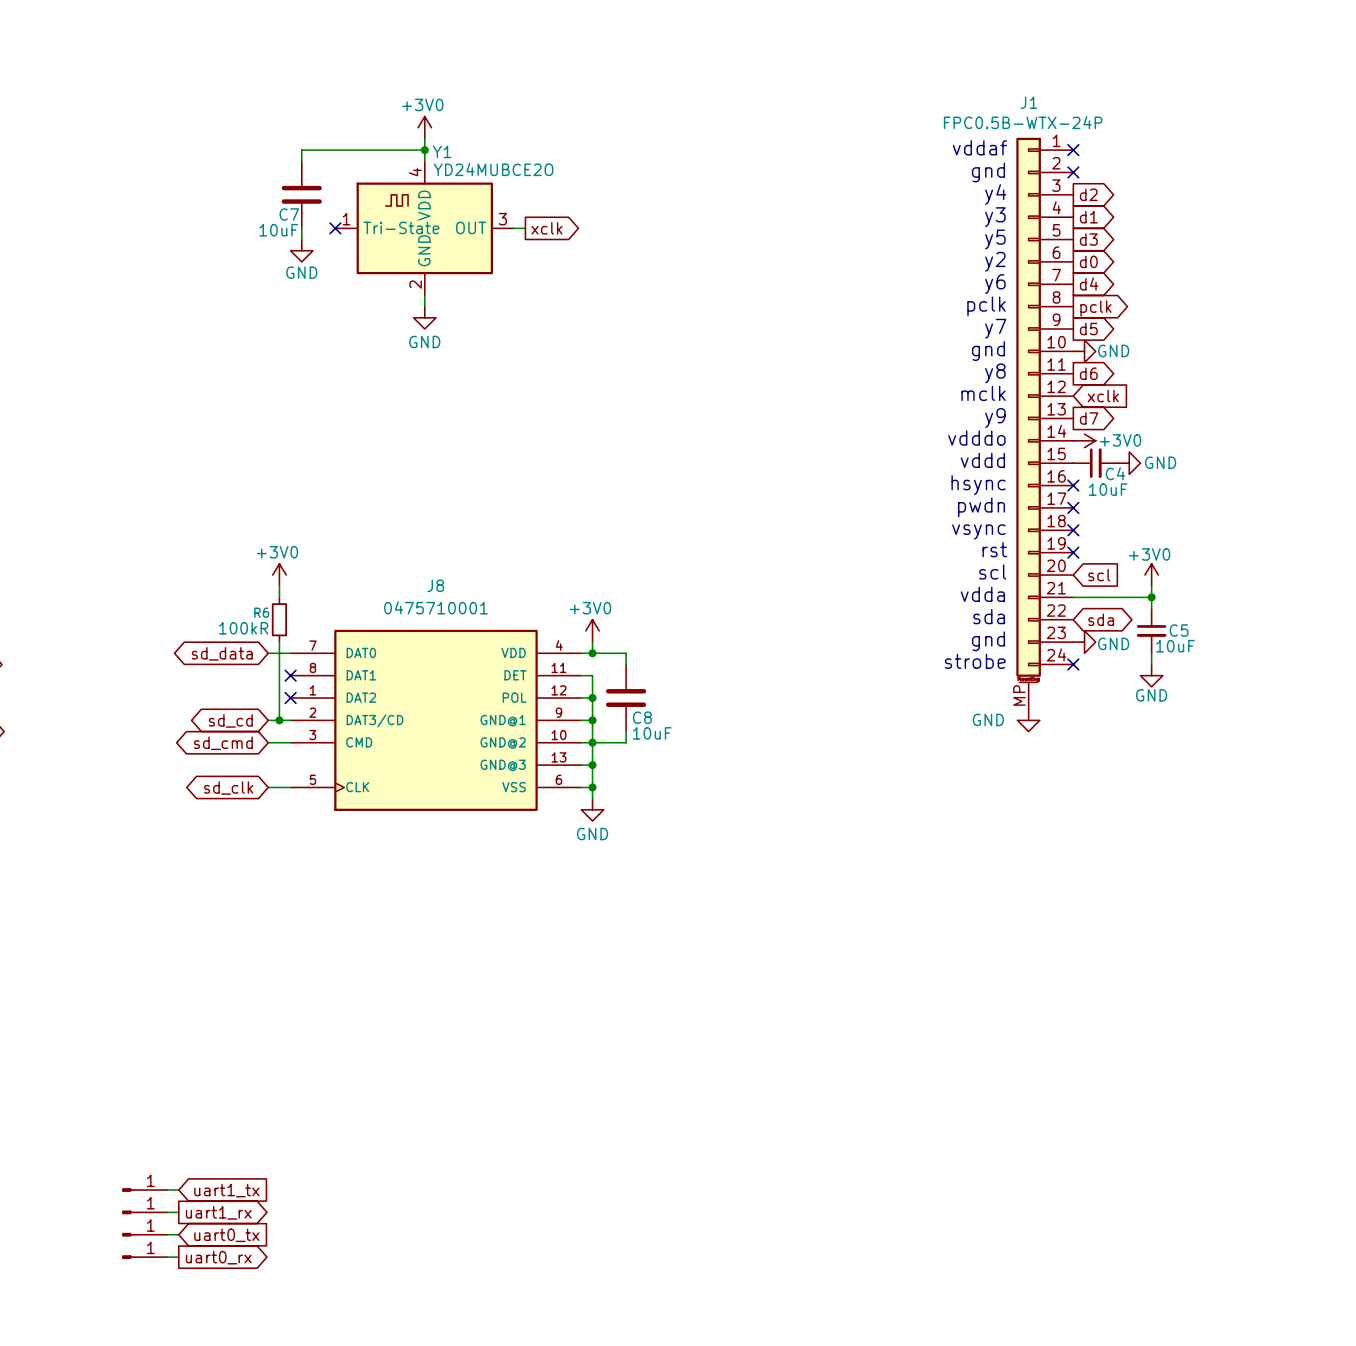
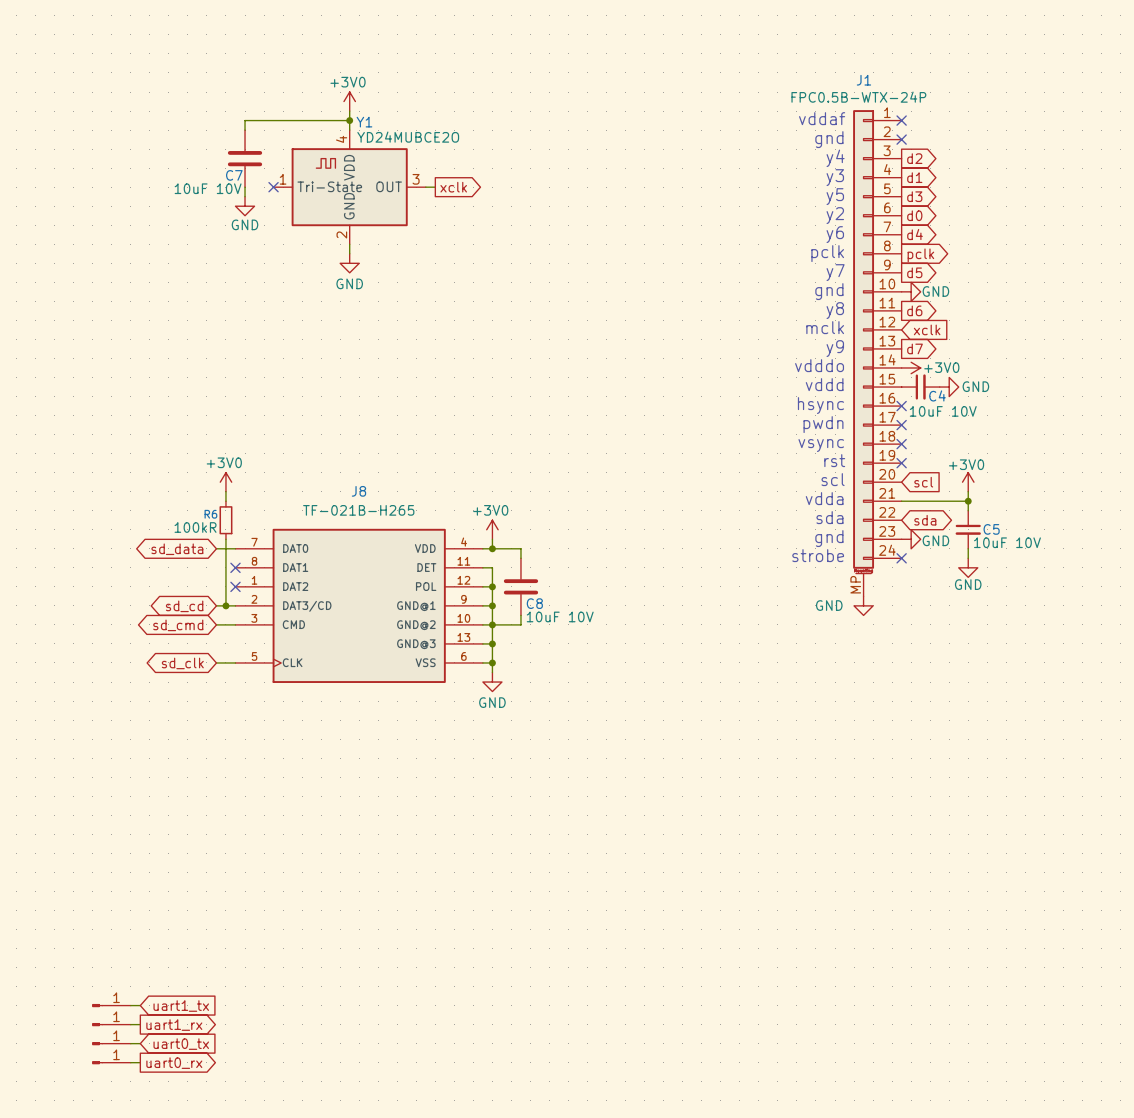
C7 value: 10uF (278, 230) -> 10uF 10V (208, 188)
C4 value: 10uF (1108, 489) -> 10uF 10V (943, 411)
J8 value: 0475710001 (435, 607) -> TF-021B-H265 (358, 510)
C5 value: 10uF (1175, 646) -> 10uF 10V (1007, 542)
C8 value: 10uF (652, 733) -> 10uF 10V (560, 616)

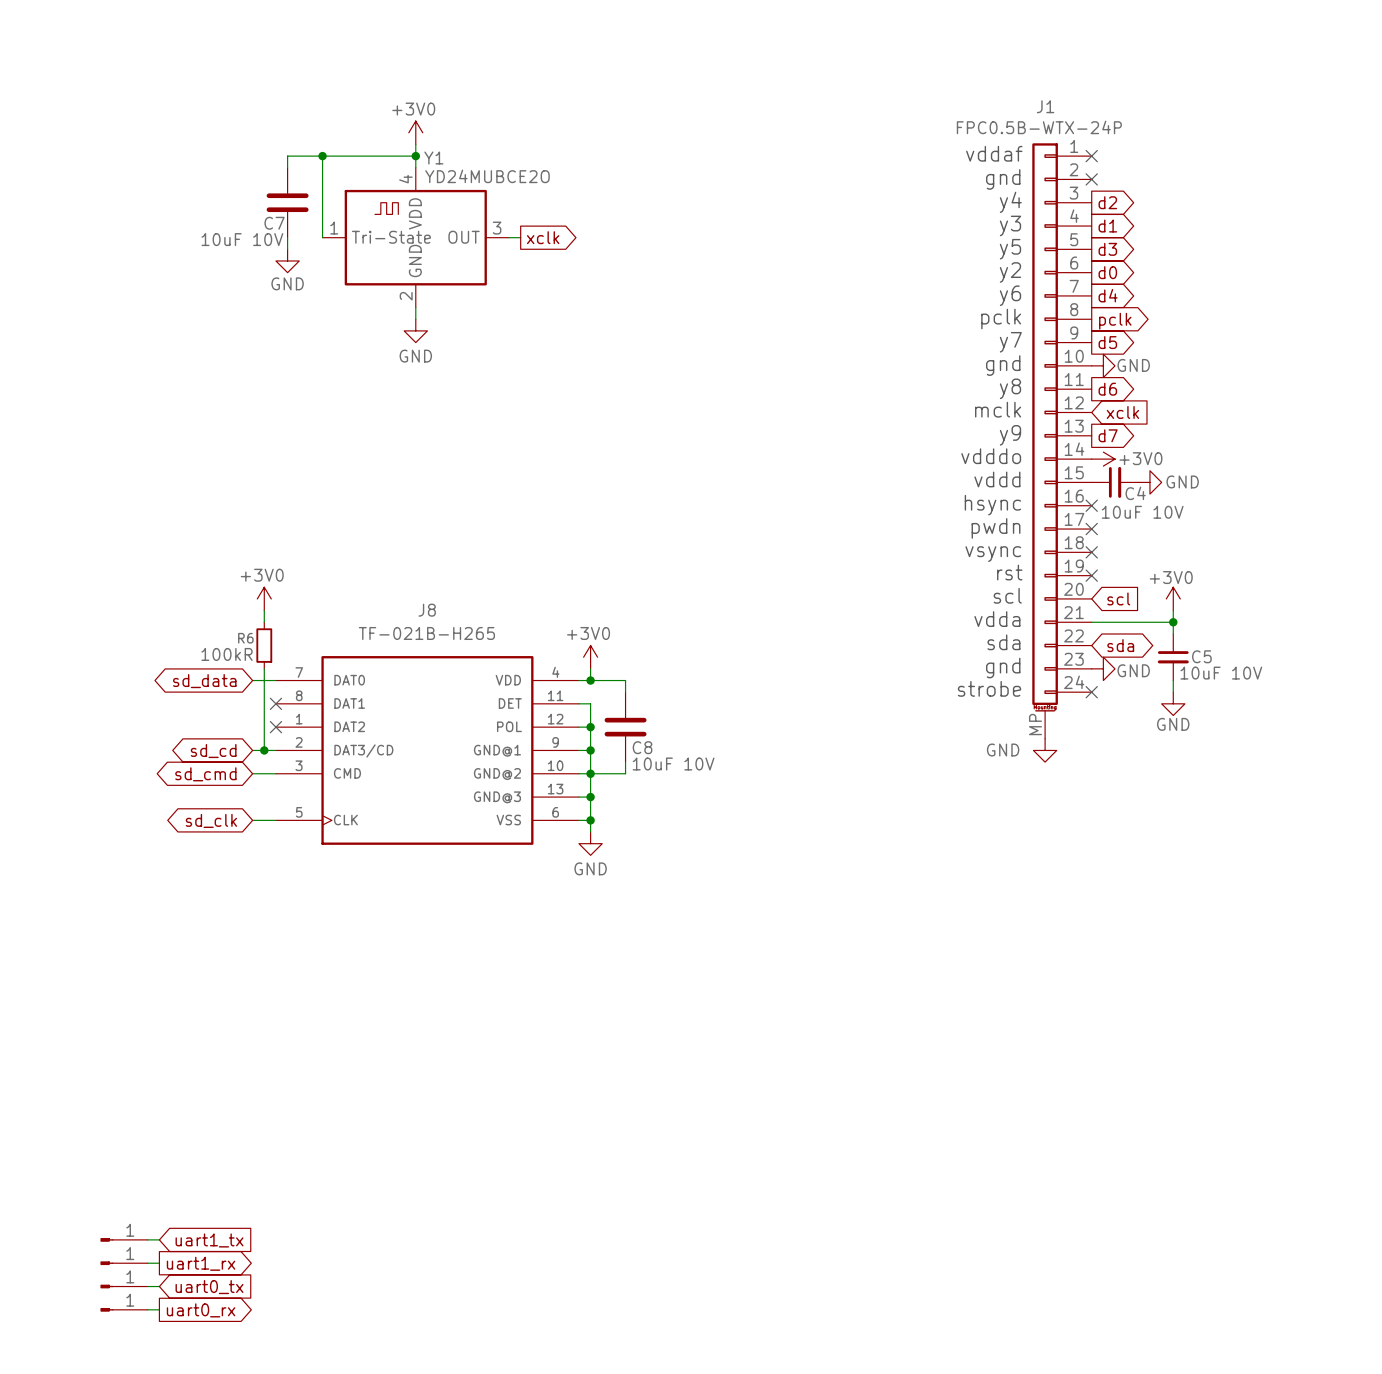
wire: none -> (322, 156) (322, 237)
junction: none -> (322, 156)
no-connect mark: (273, 187) -> none

